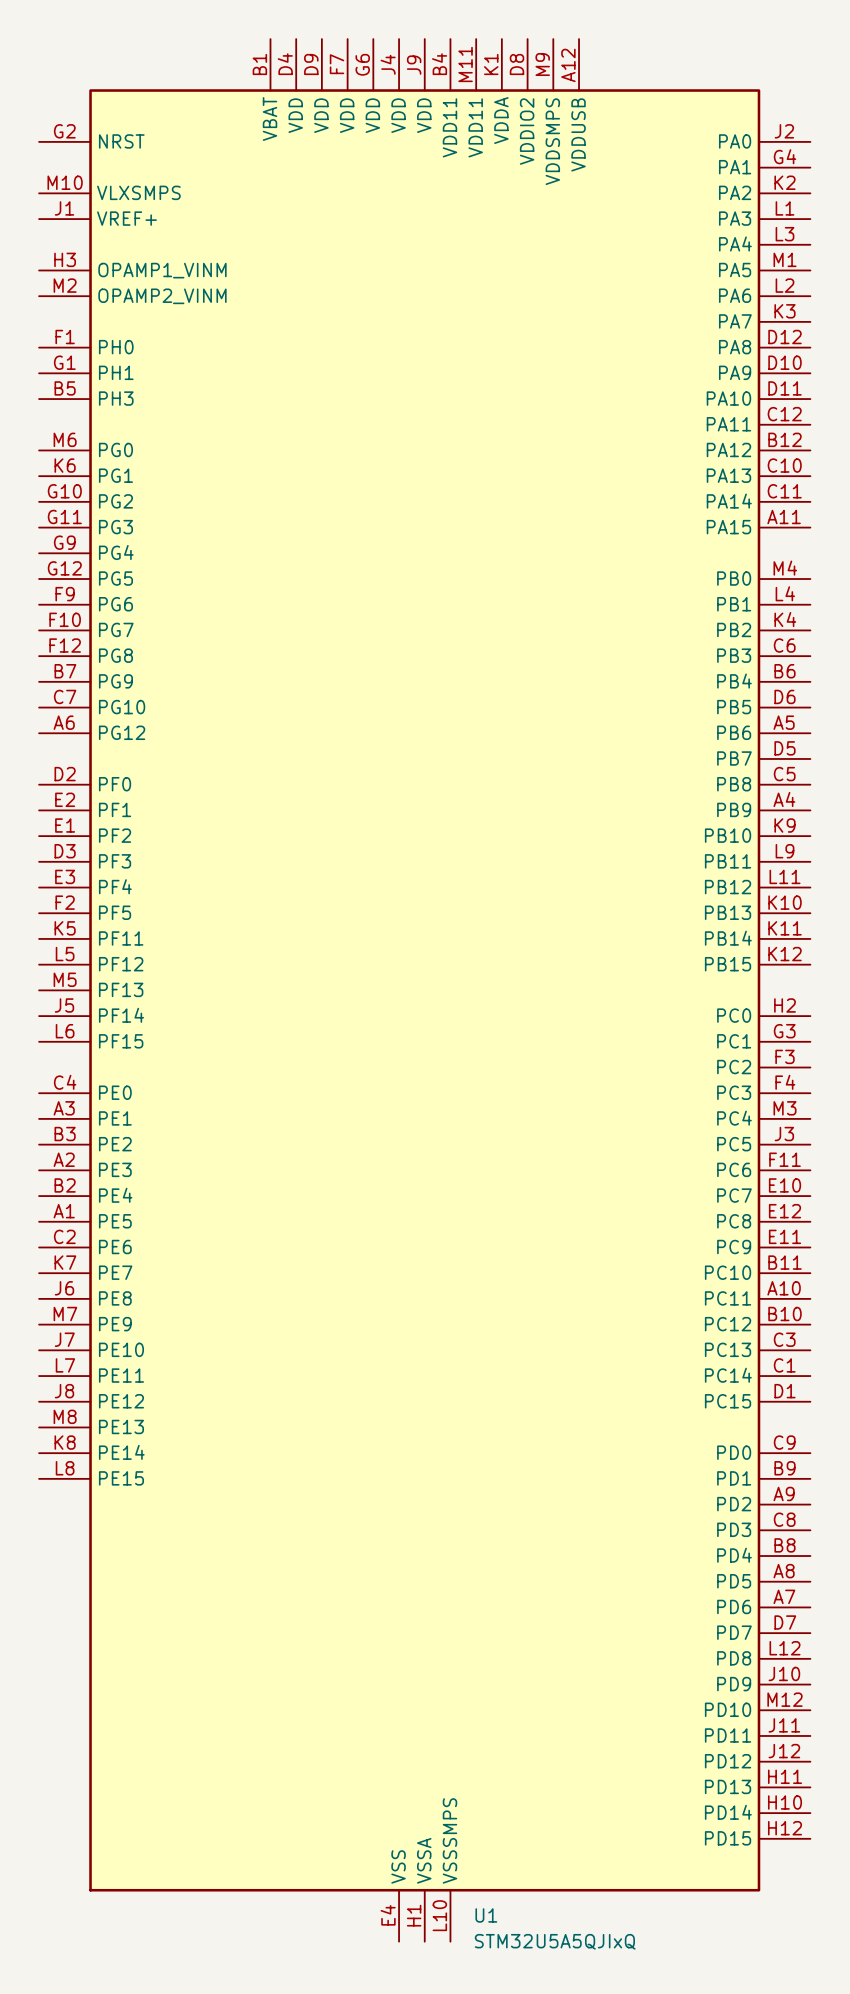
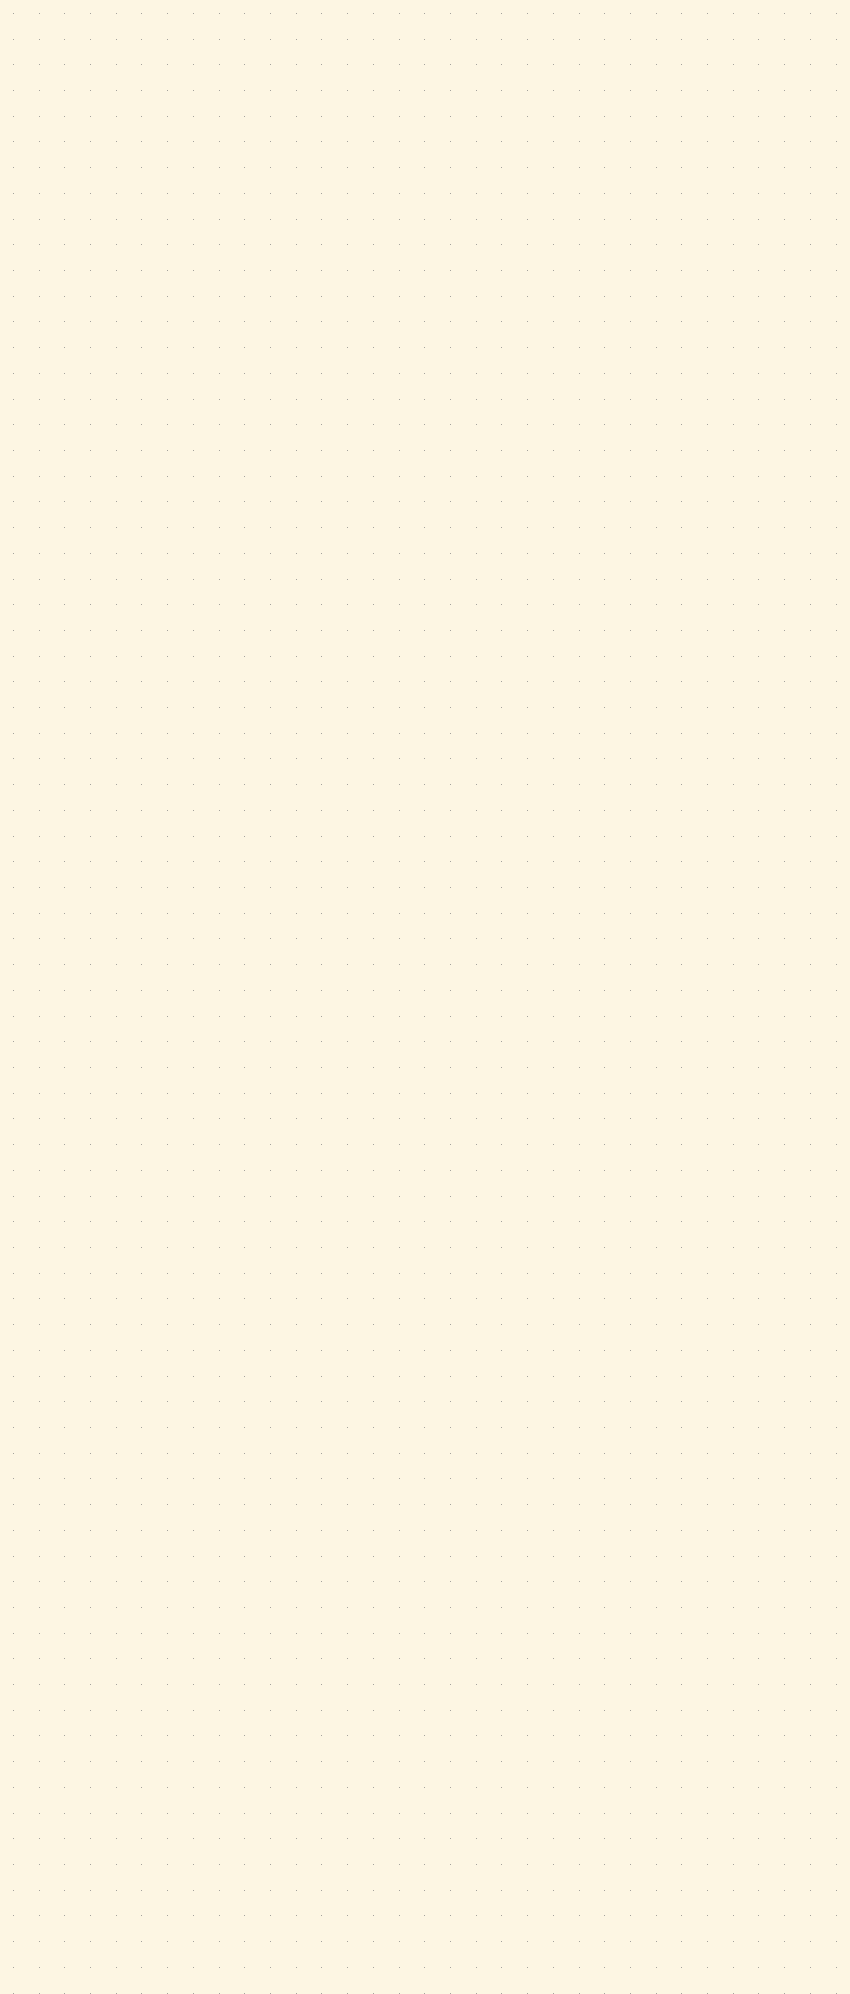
U1: STM32U5A5QJIxQ (424, 990) -> none

